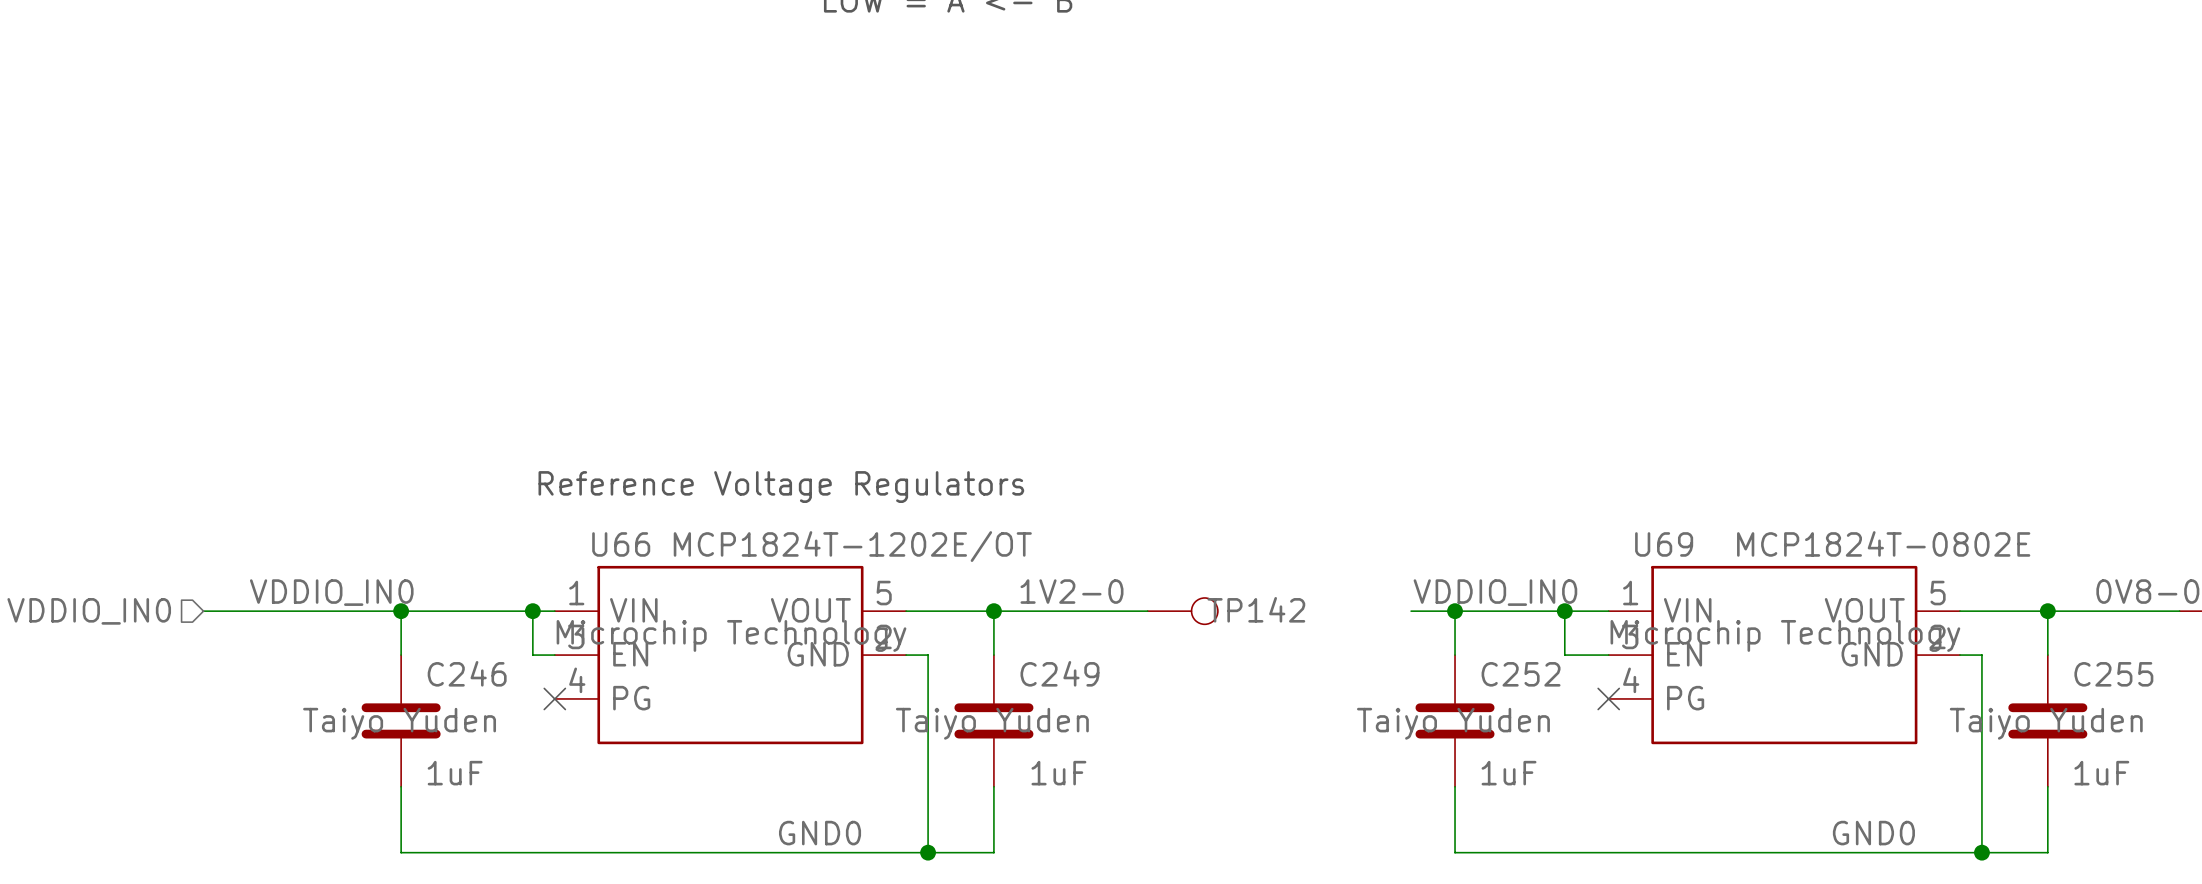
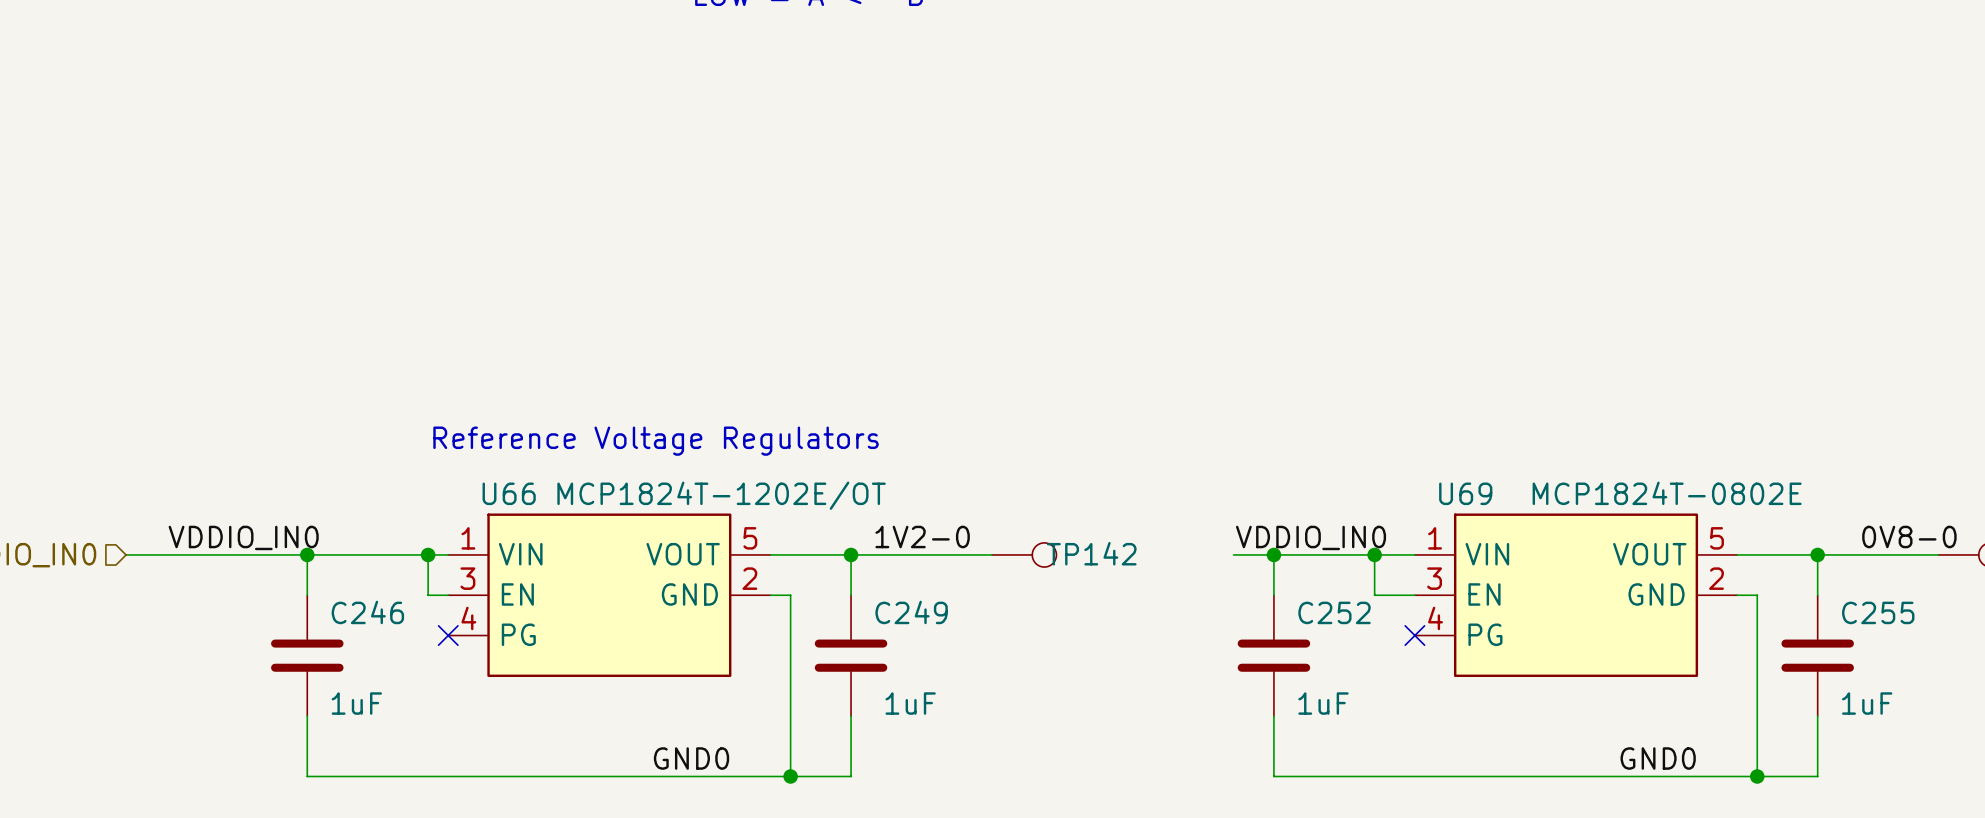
U66 text: Microchip Technology (731, 635) -> none
U69 text: Microchip Technology (1785, 635) -> none
C246 text: Taiyo Yuden (399, 723) -> none
C249 text: Taiyo Yuden (992, 723) -> none
C252 text: Taiyo Yuden (1453, 723) -> none
C255 text: Taiyo Yuden (2046, 723) -> none

